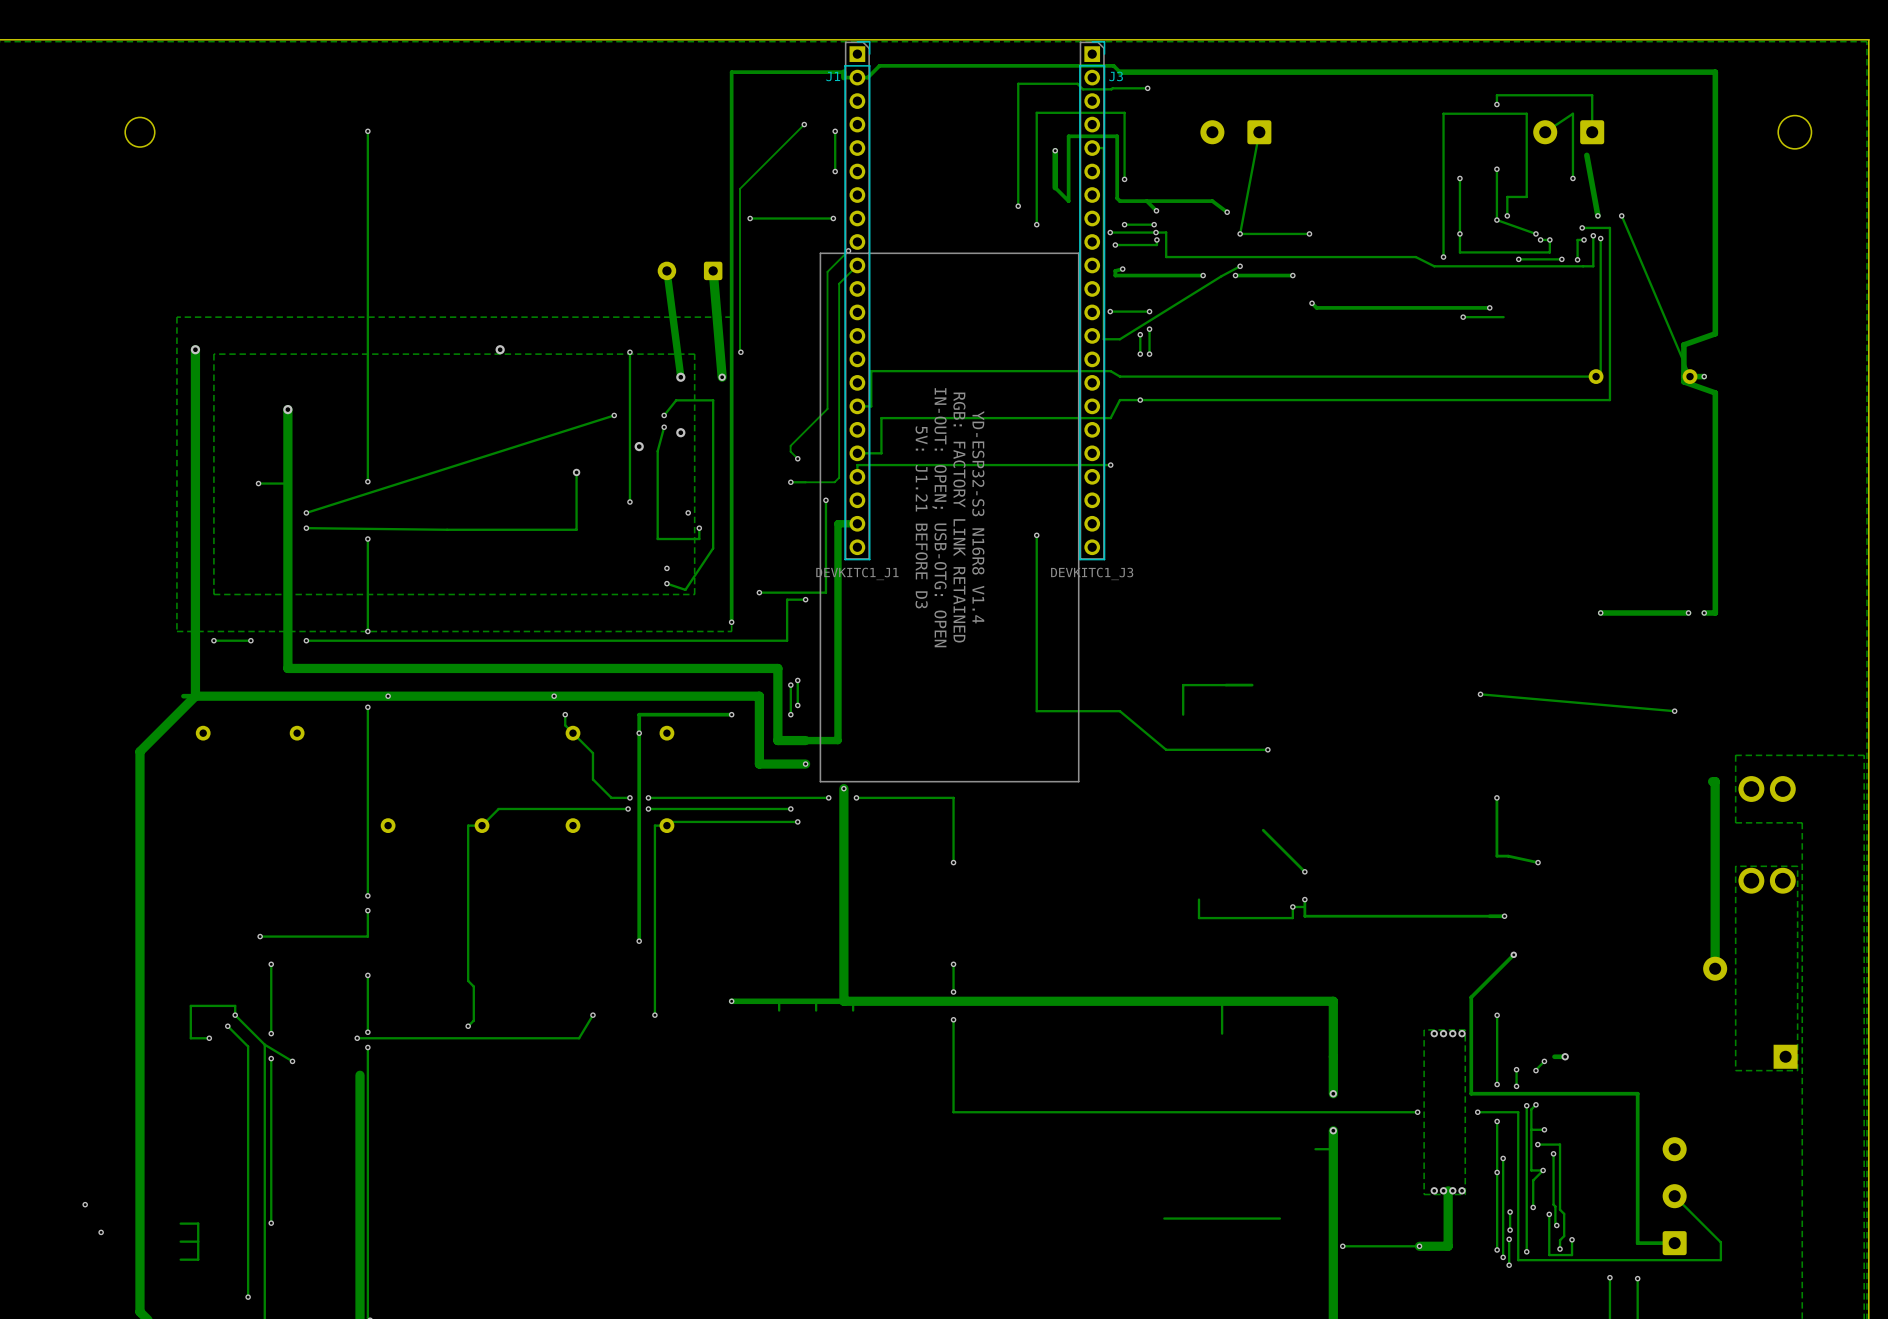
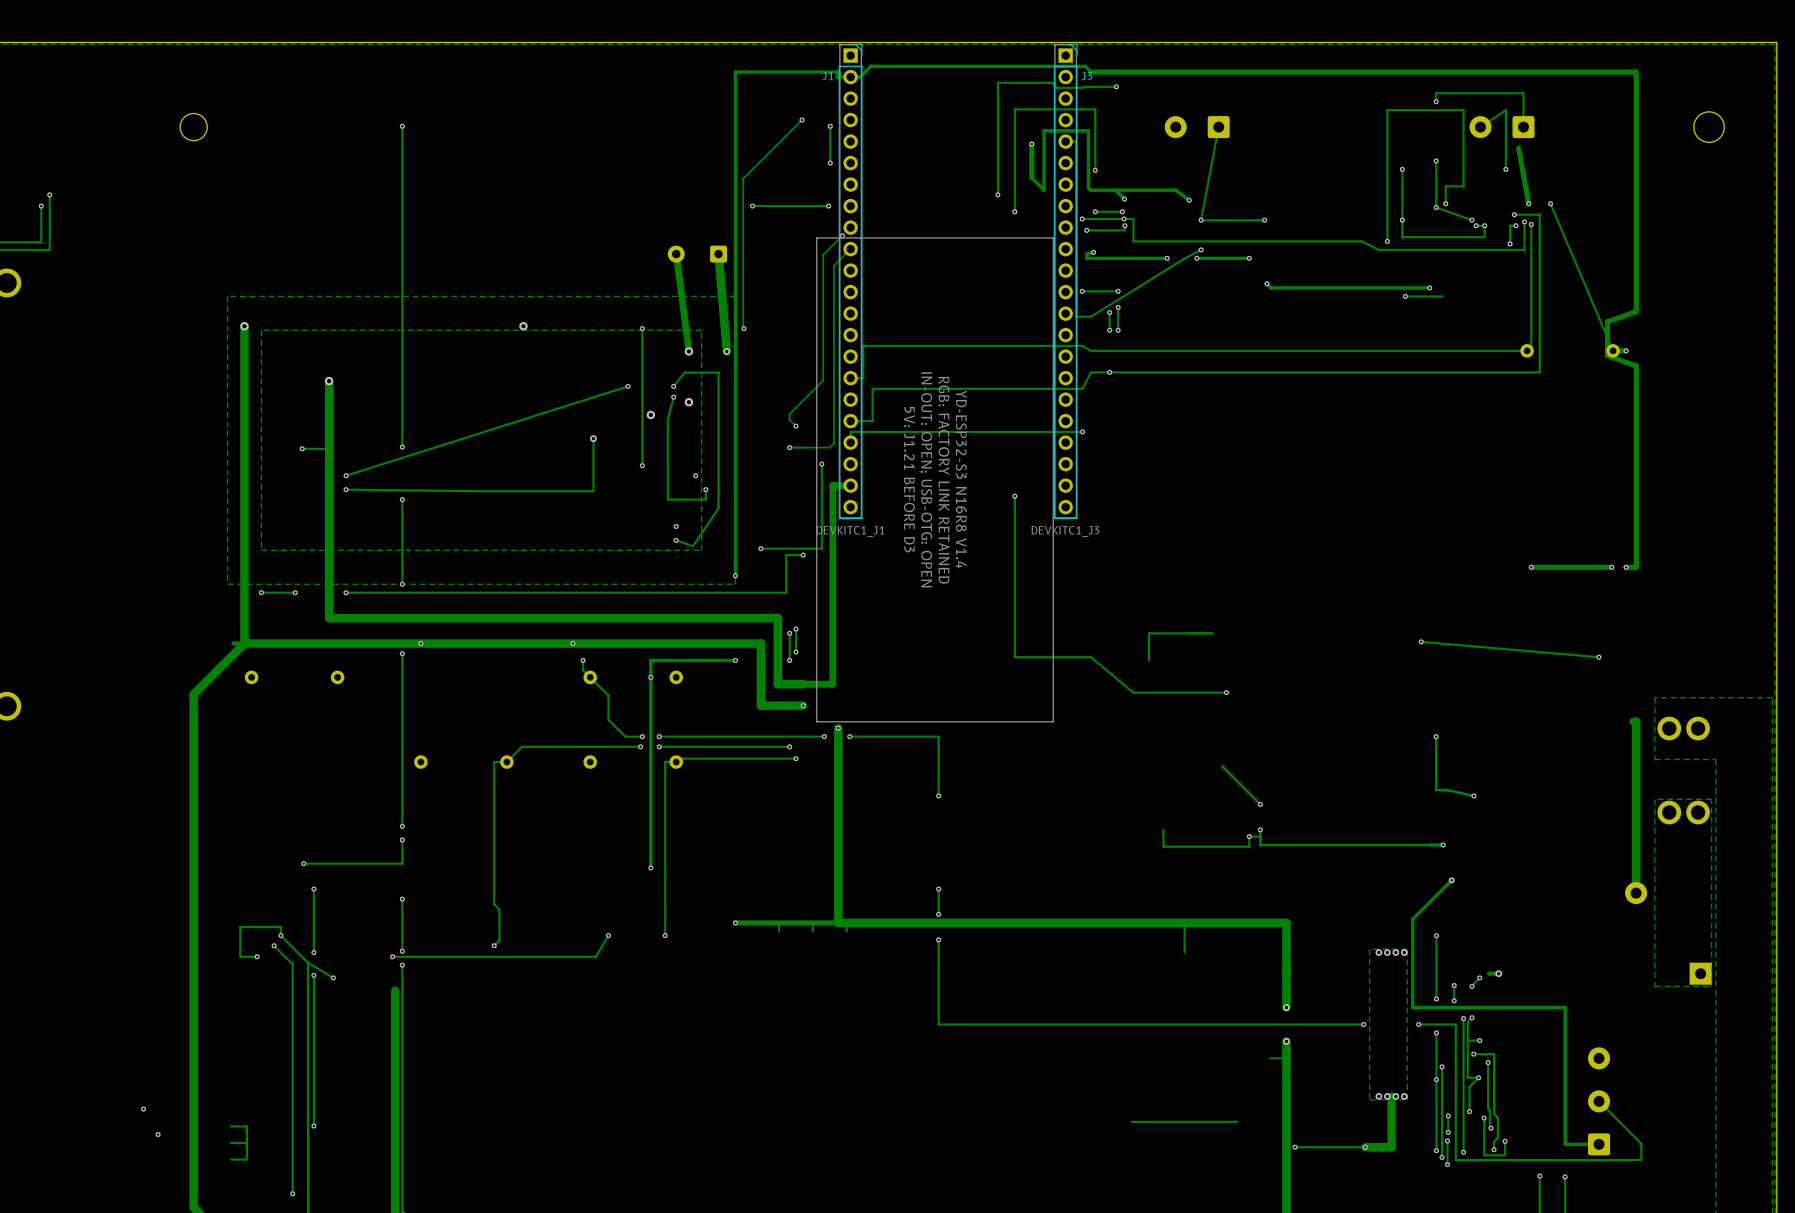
via: (1518, 259) -> none
track: (1561, 259) (1518, 259) -> none
via: (1561, 259) -> none

